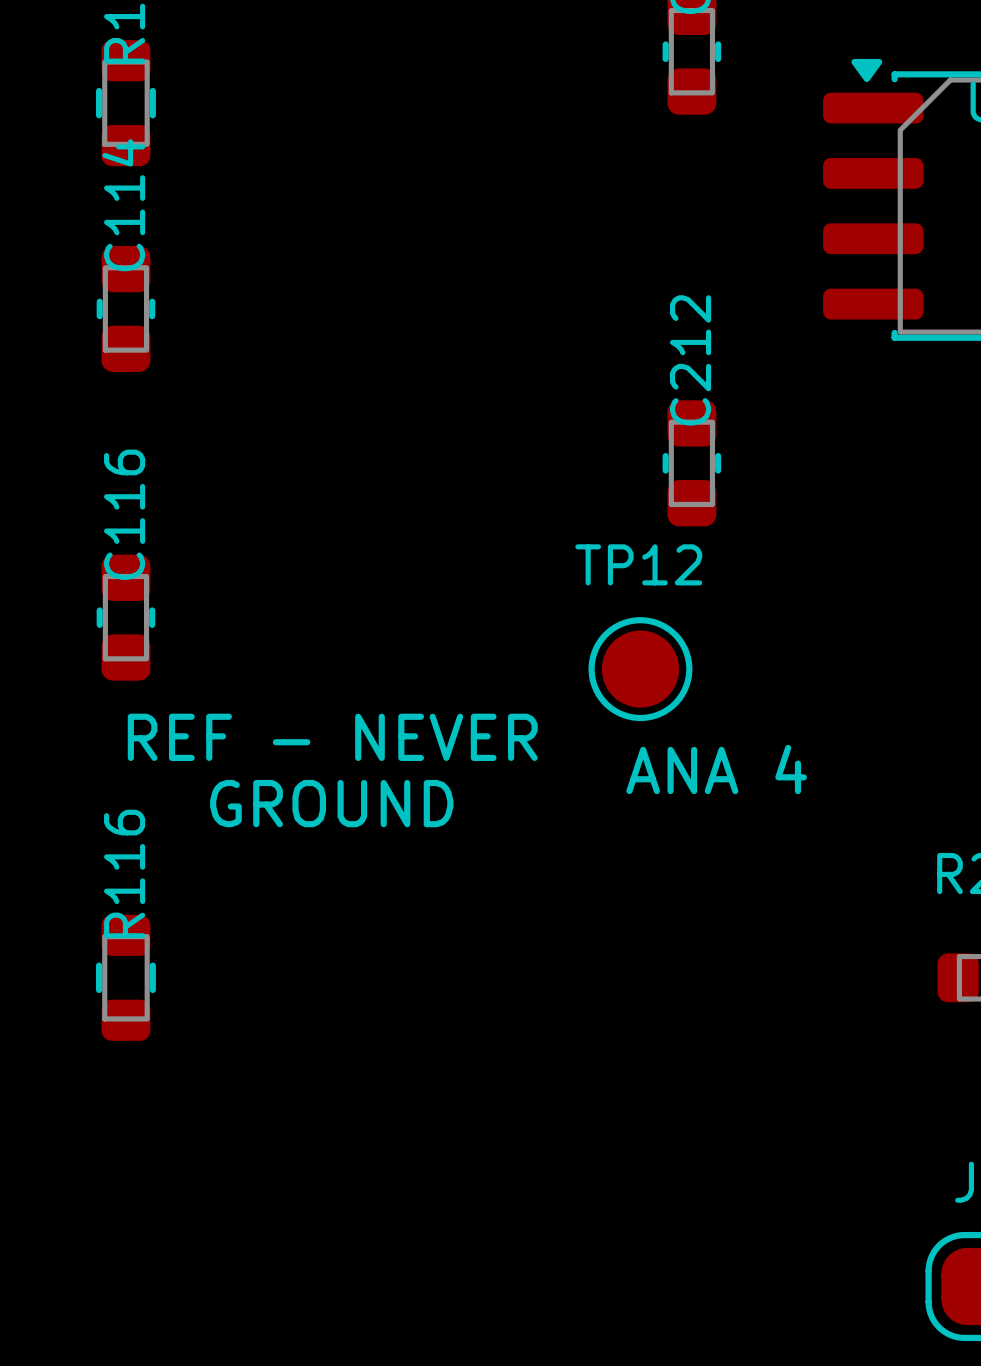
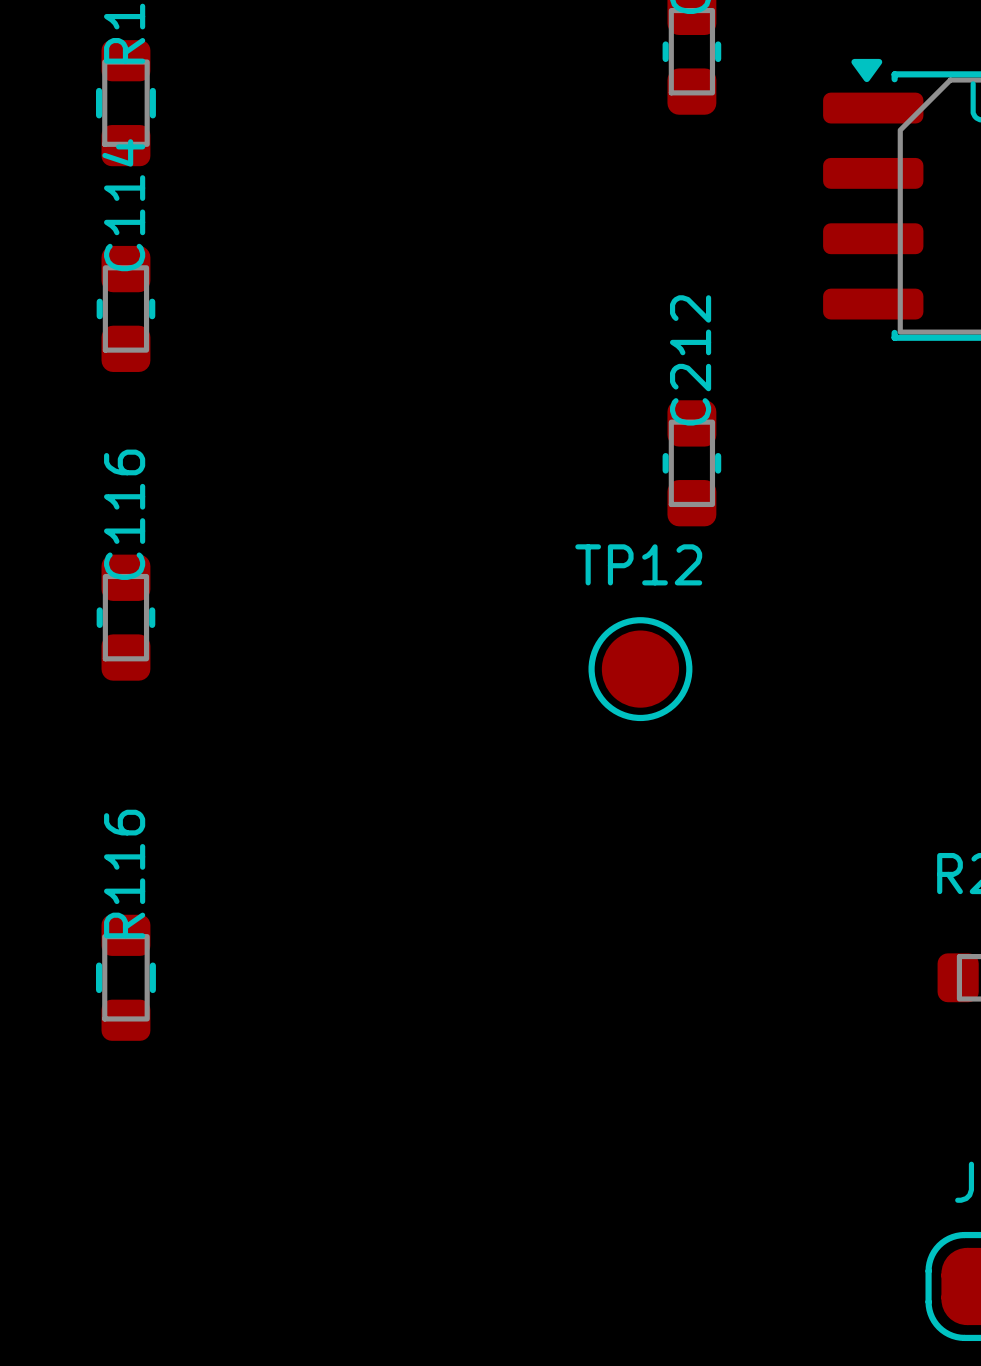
text: REF - NEVER (332, 737) -> none
text: ANA 4 (716, 769) -> none
text: GROUND (331, 803) -> none

